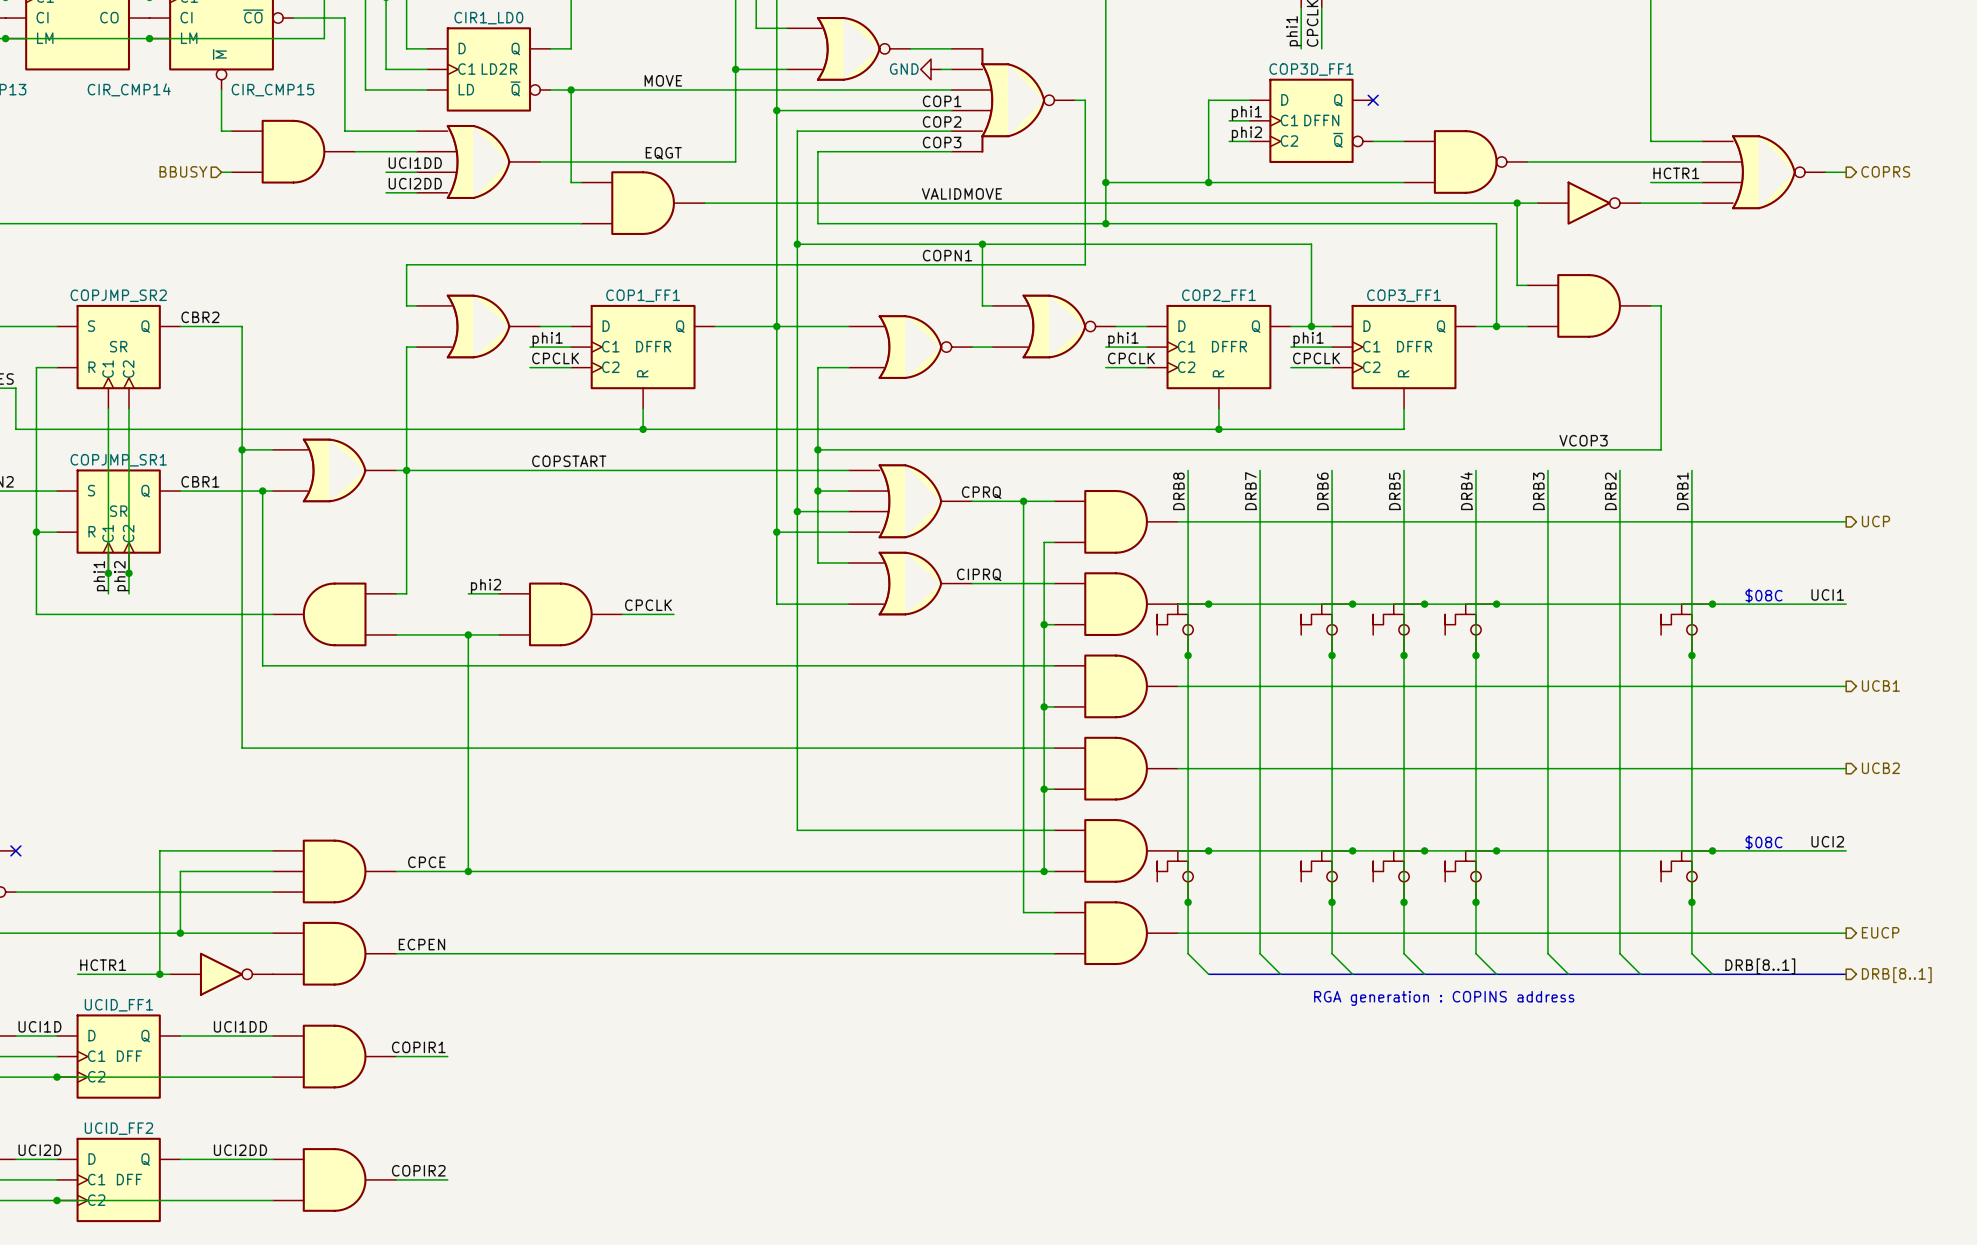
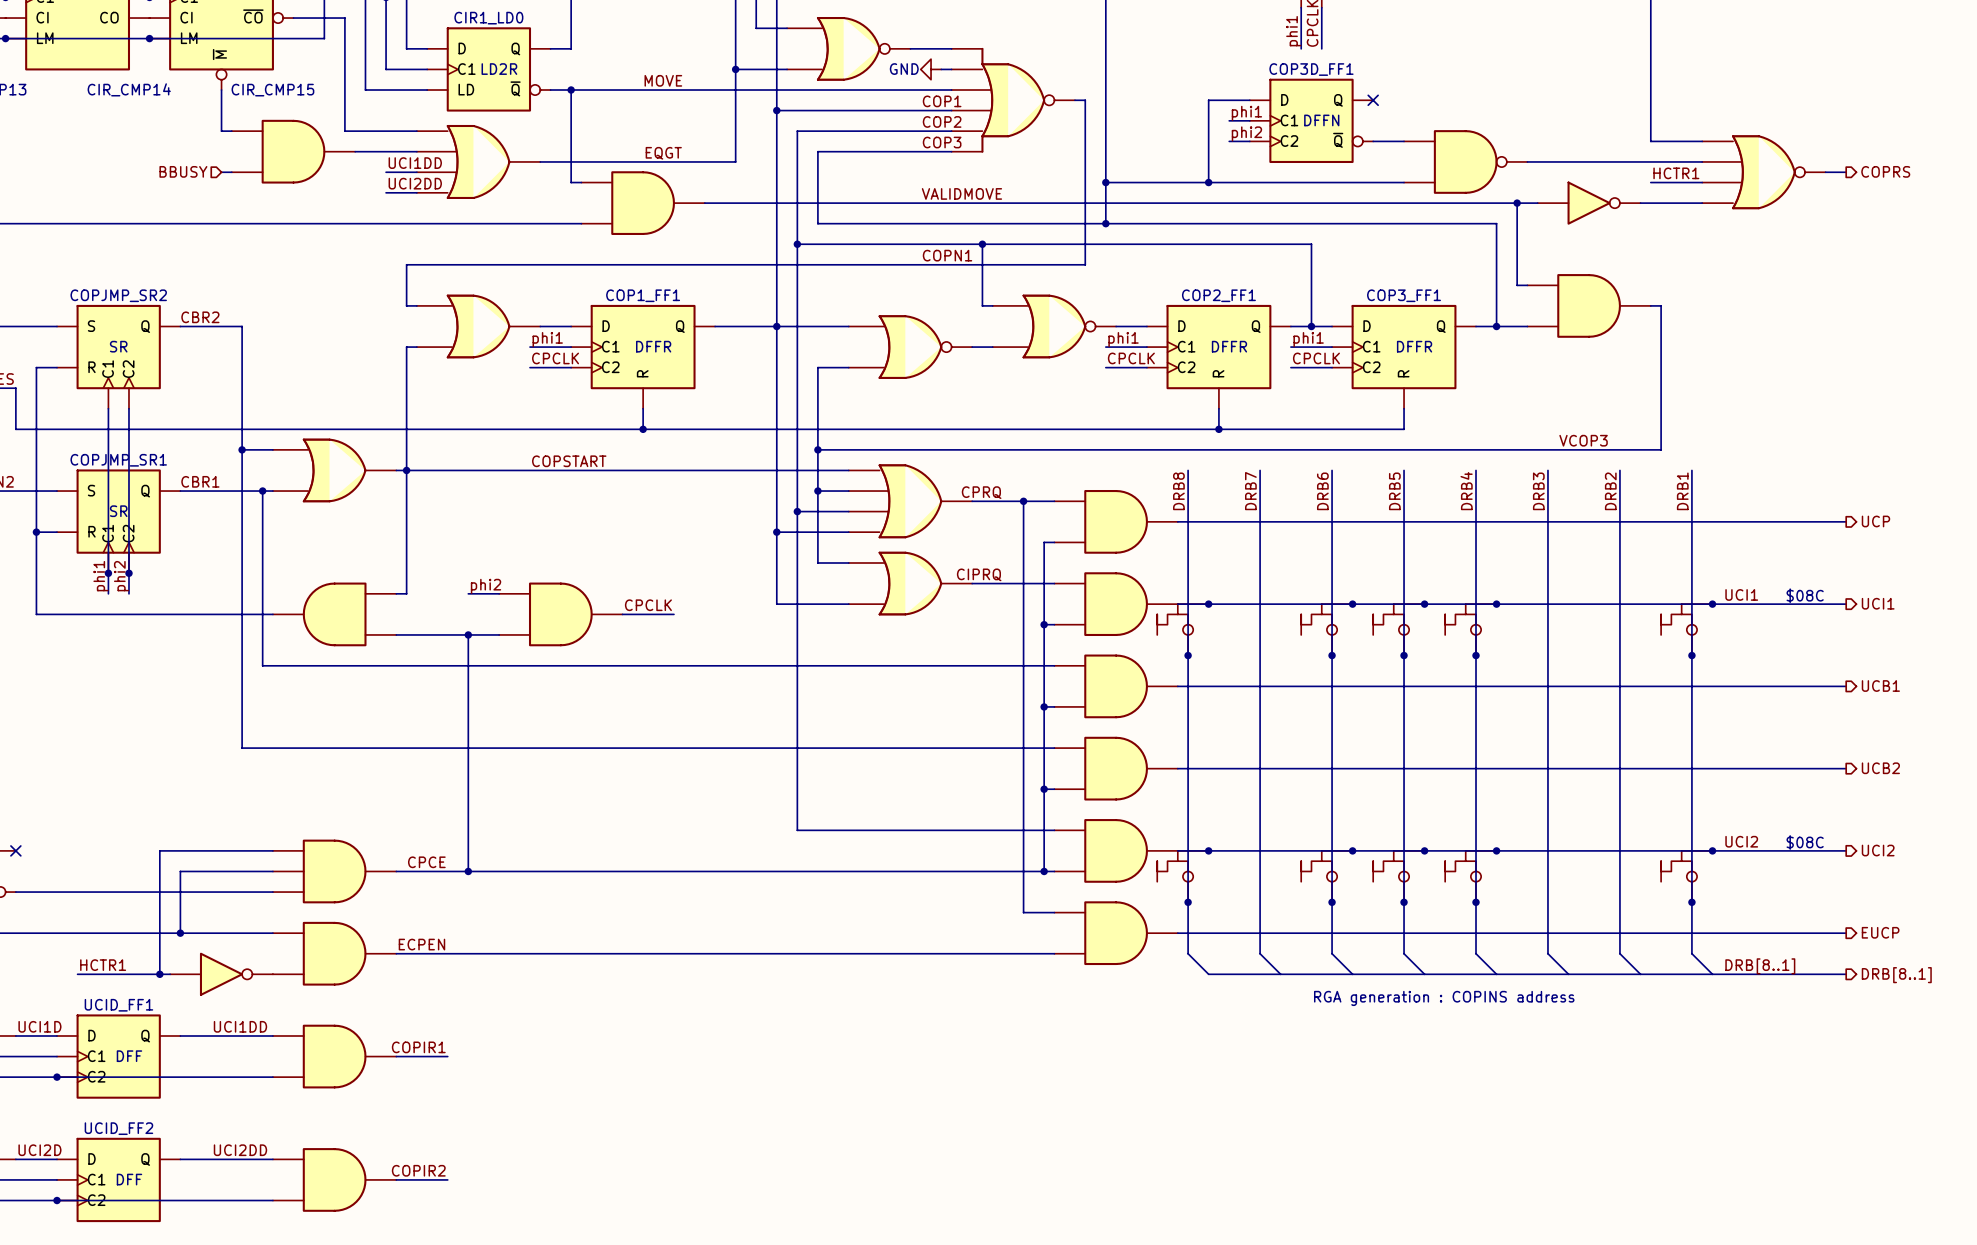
label position: UCI1 (1827, 594) -> UCI1 (1741, 594)
text position: $08C (1763, 595) -> $08C (1805, 595)
hierarchical label: none -> UCI1 (1878, 603)
label position: UCI2 (1827, 841) -> UCI2 (1741, 841)
text position: $08C (1763, 842) -> $08C (1805, 842)
hierarchical label: none -> UCI2 (1878, 850)

